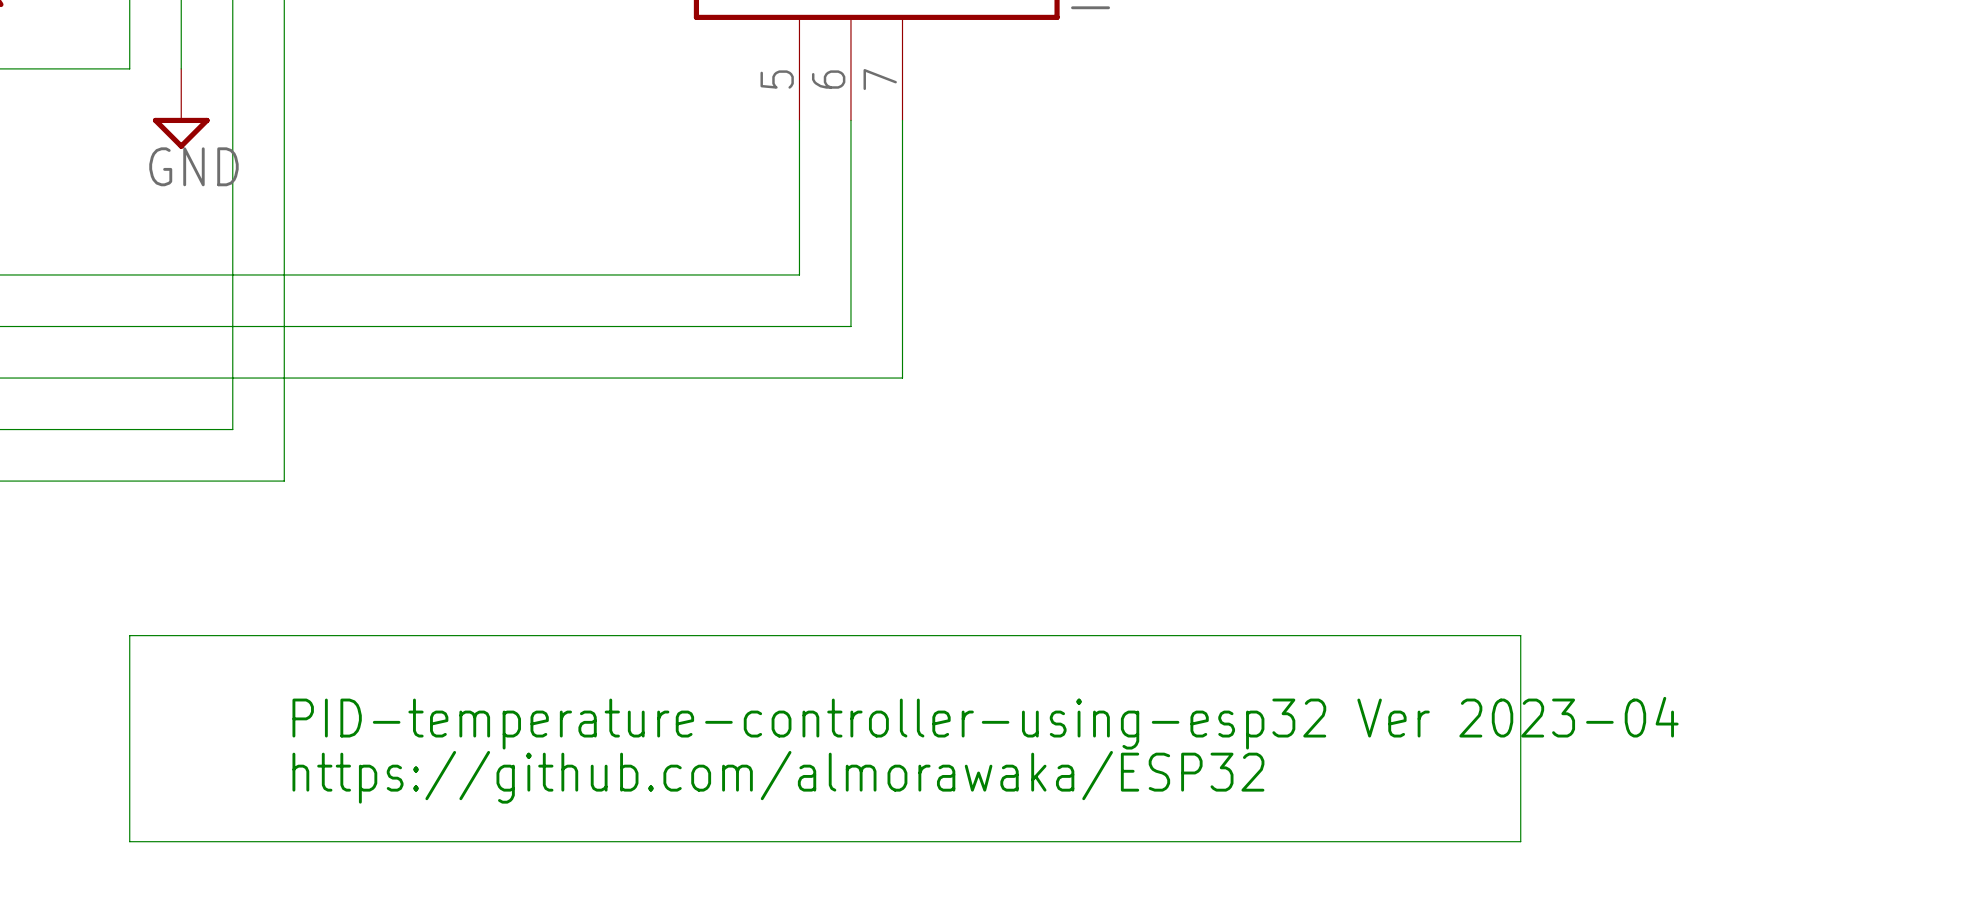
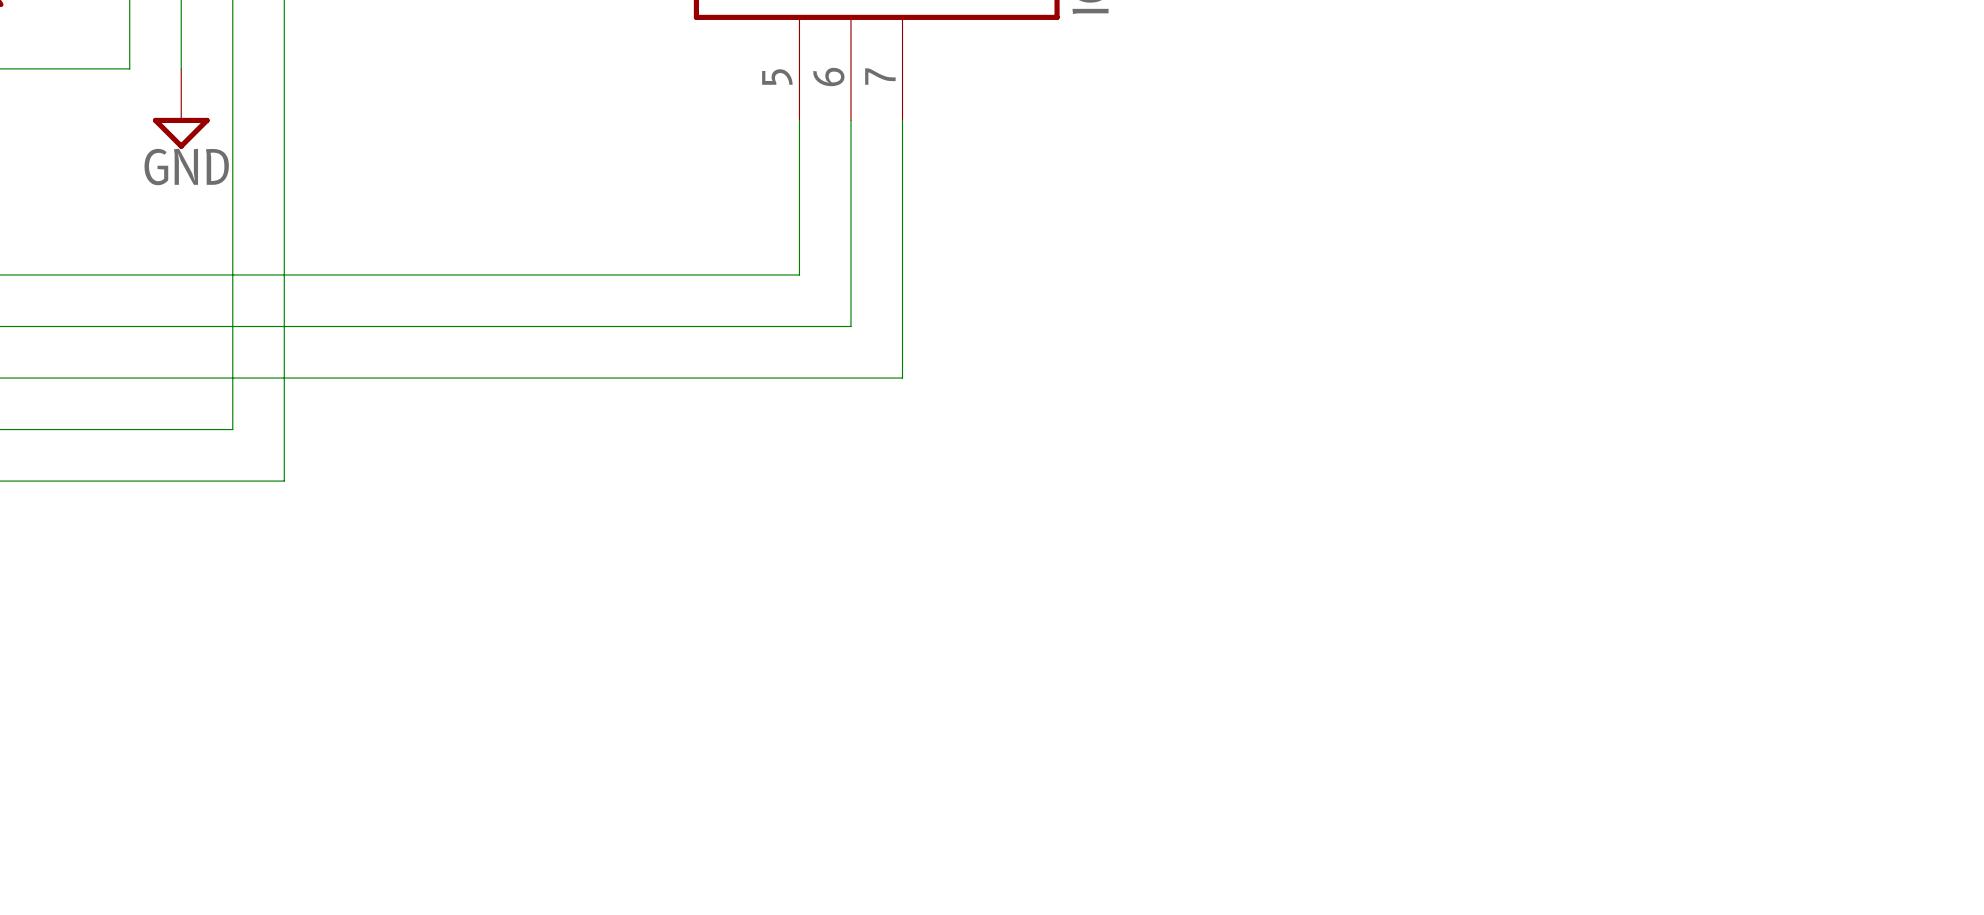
wire: (129, 635) (1520, 635) (1520, 841) (129, 841) (129, 635) -> none
text: PID-temperature-controller-using-esp32 Ver 2023-04 (985, 723) -> none
text: https://github.com/almorawaka/ESP32 (778, 777) -> none

